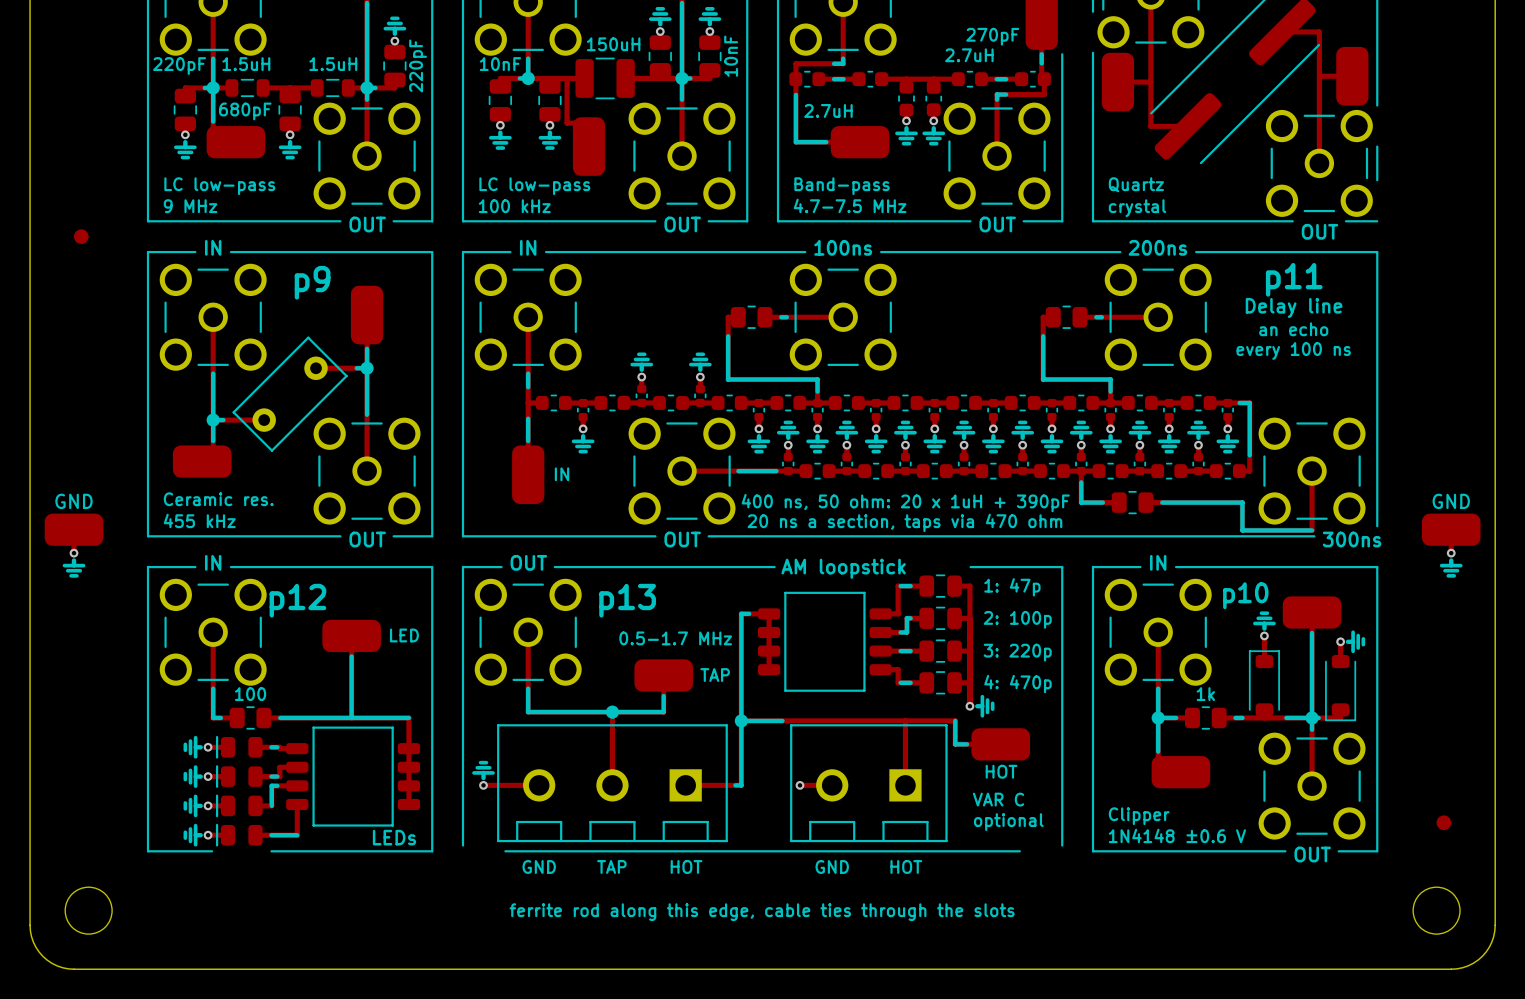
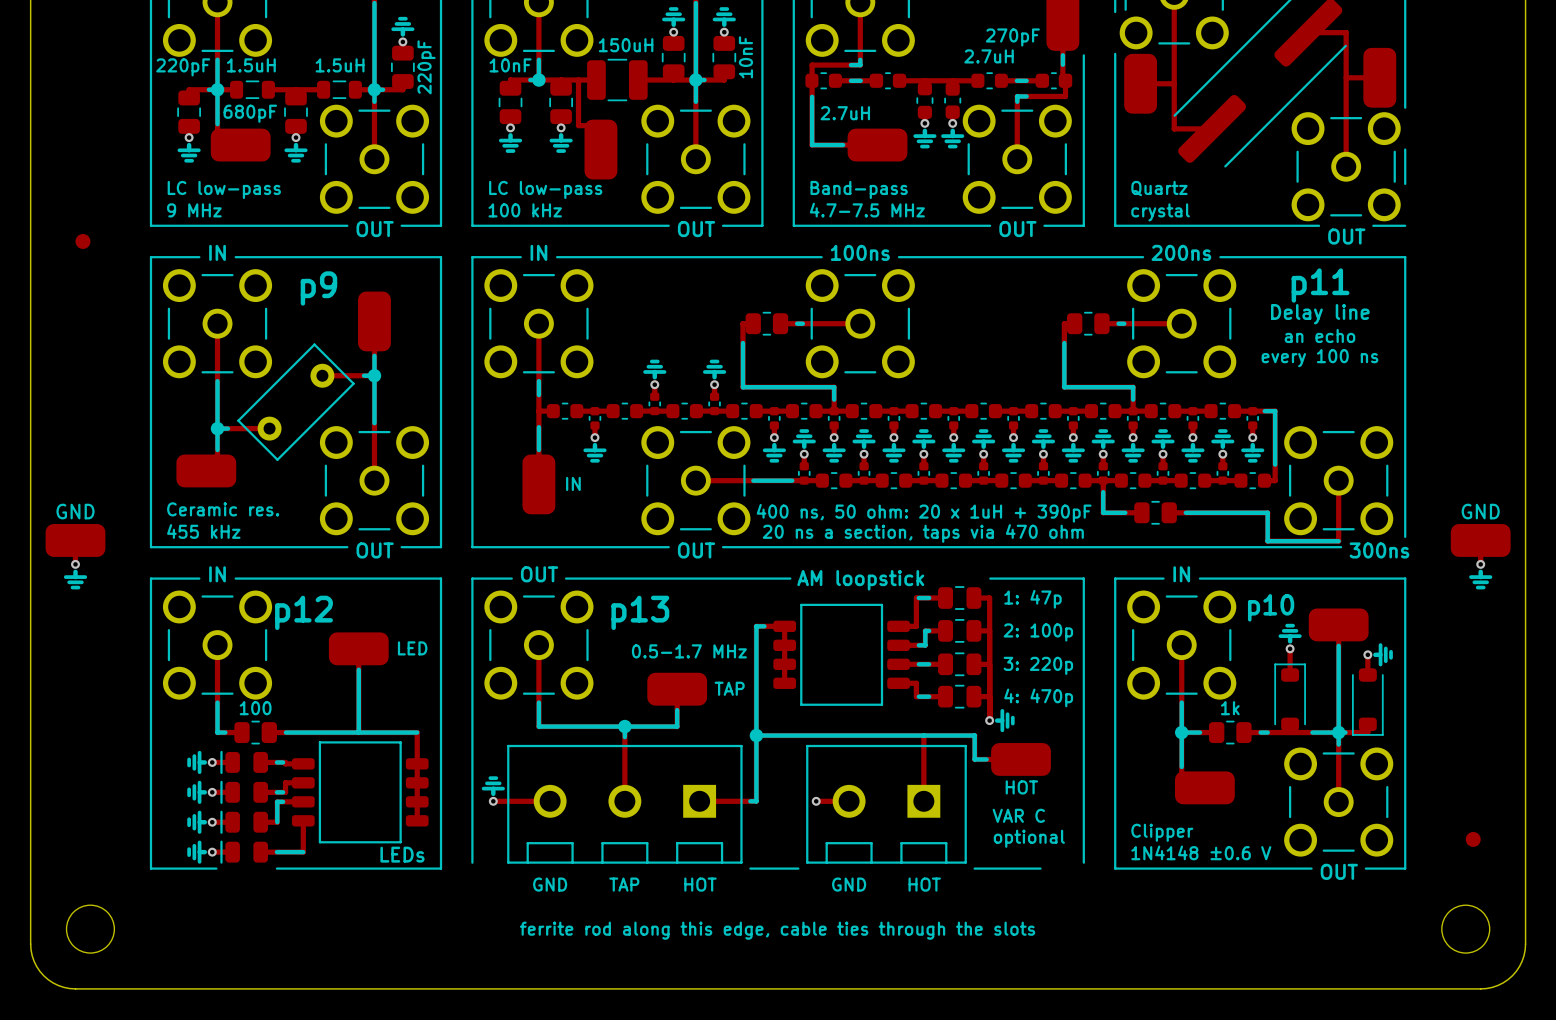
line: none -> (624, 731) (624, 737)
part footprint: [497, 724, 728, 843] -> [507, 744, 743, 864]
part footprint: [790, 724, 948, 843] -> [806, 744, 967, 864]
line: (505, 851) (735, 851) -> none
line: (782, 851) (955, 851) -> (798, 735) (974, 735)

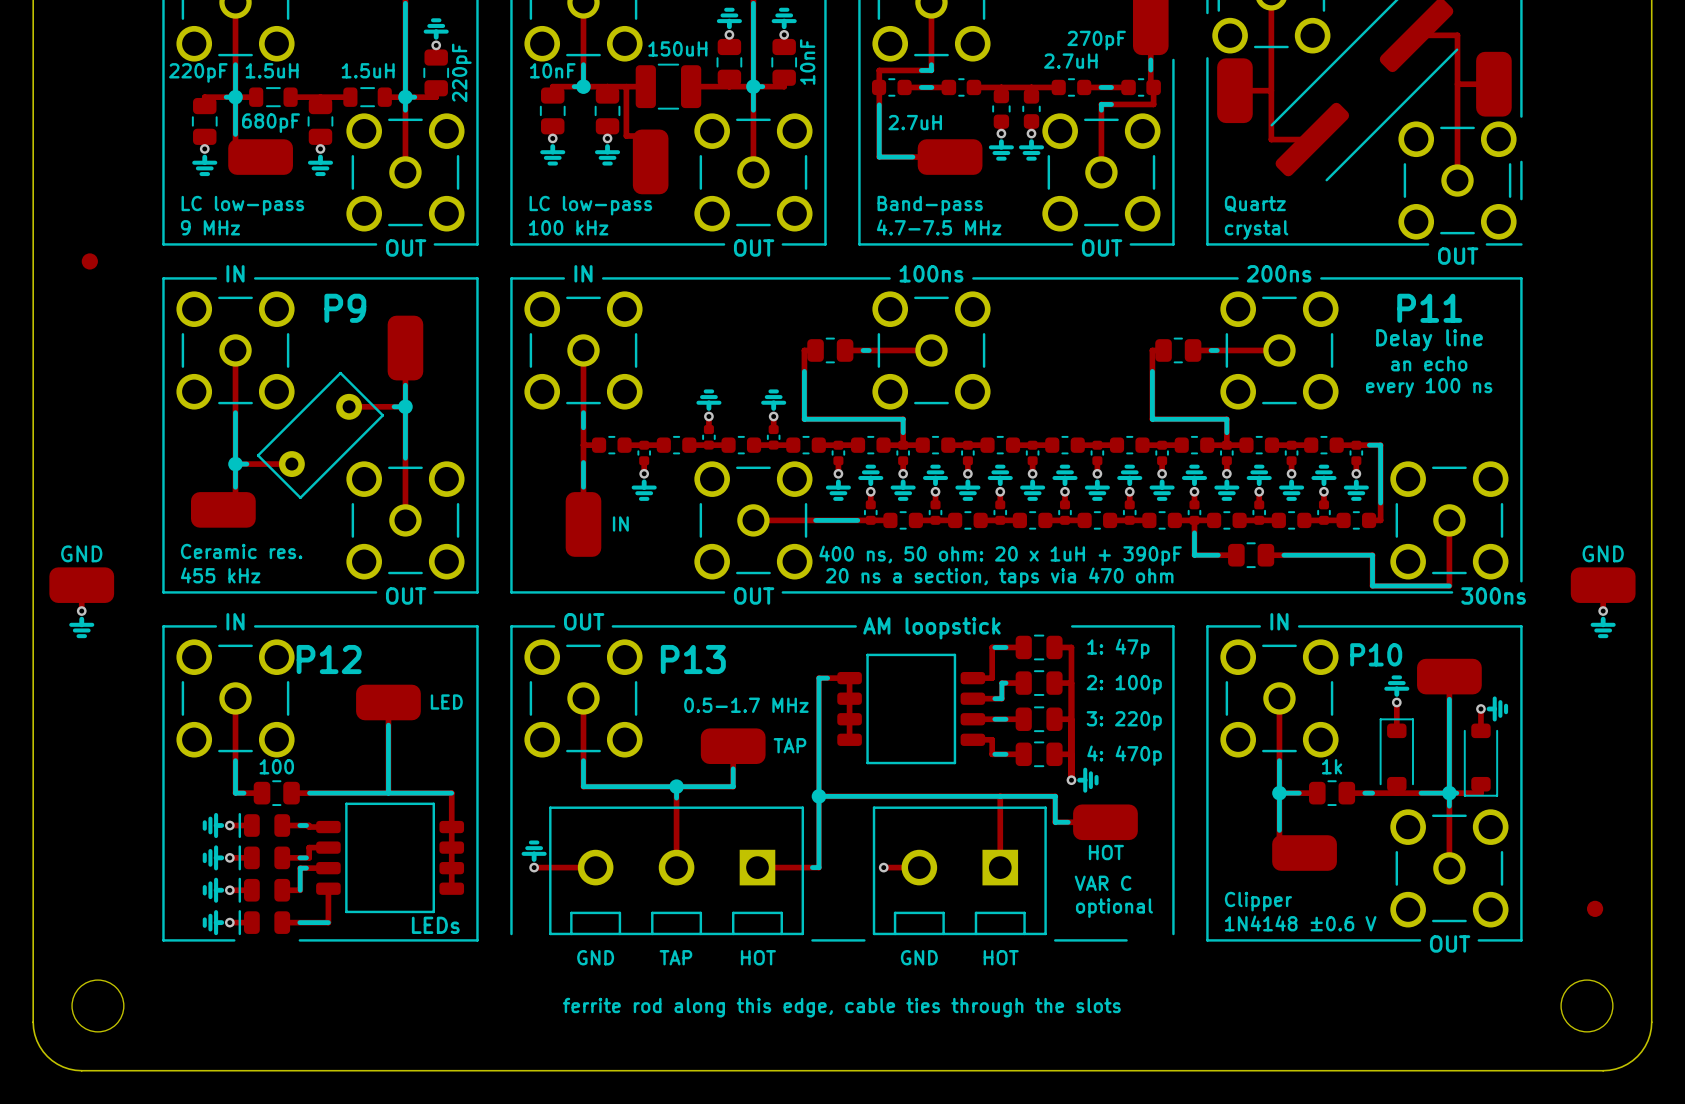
text: p11 (1320, 285) -> P11 (1429, 308)
text: p9 (318, 288) -> P9 (345, 308)
text: p10 (1271, 607) -> P10 (1376, 654)
text: p12 (304, 612) -> P12 (329, 659)
text: p13 (640, 612) -> P13 (693, 659)

